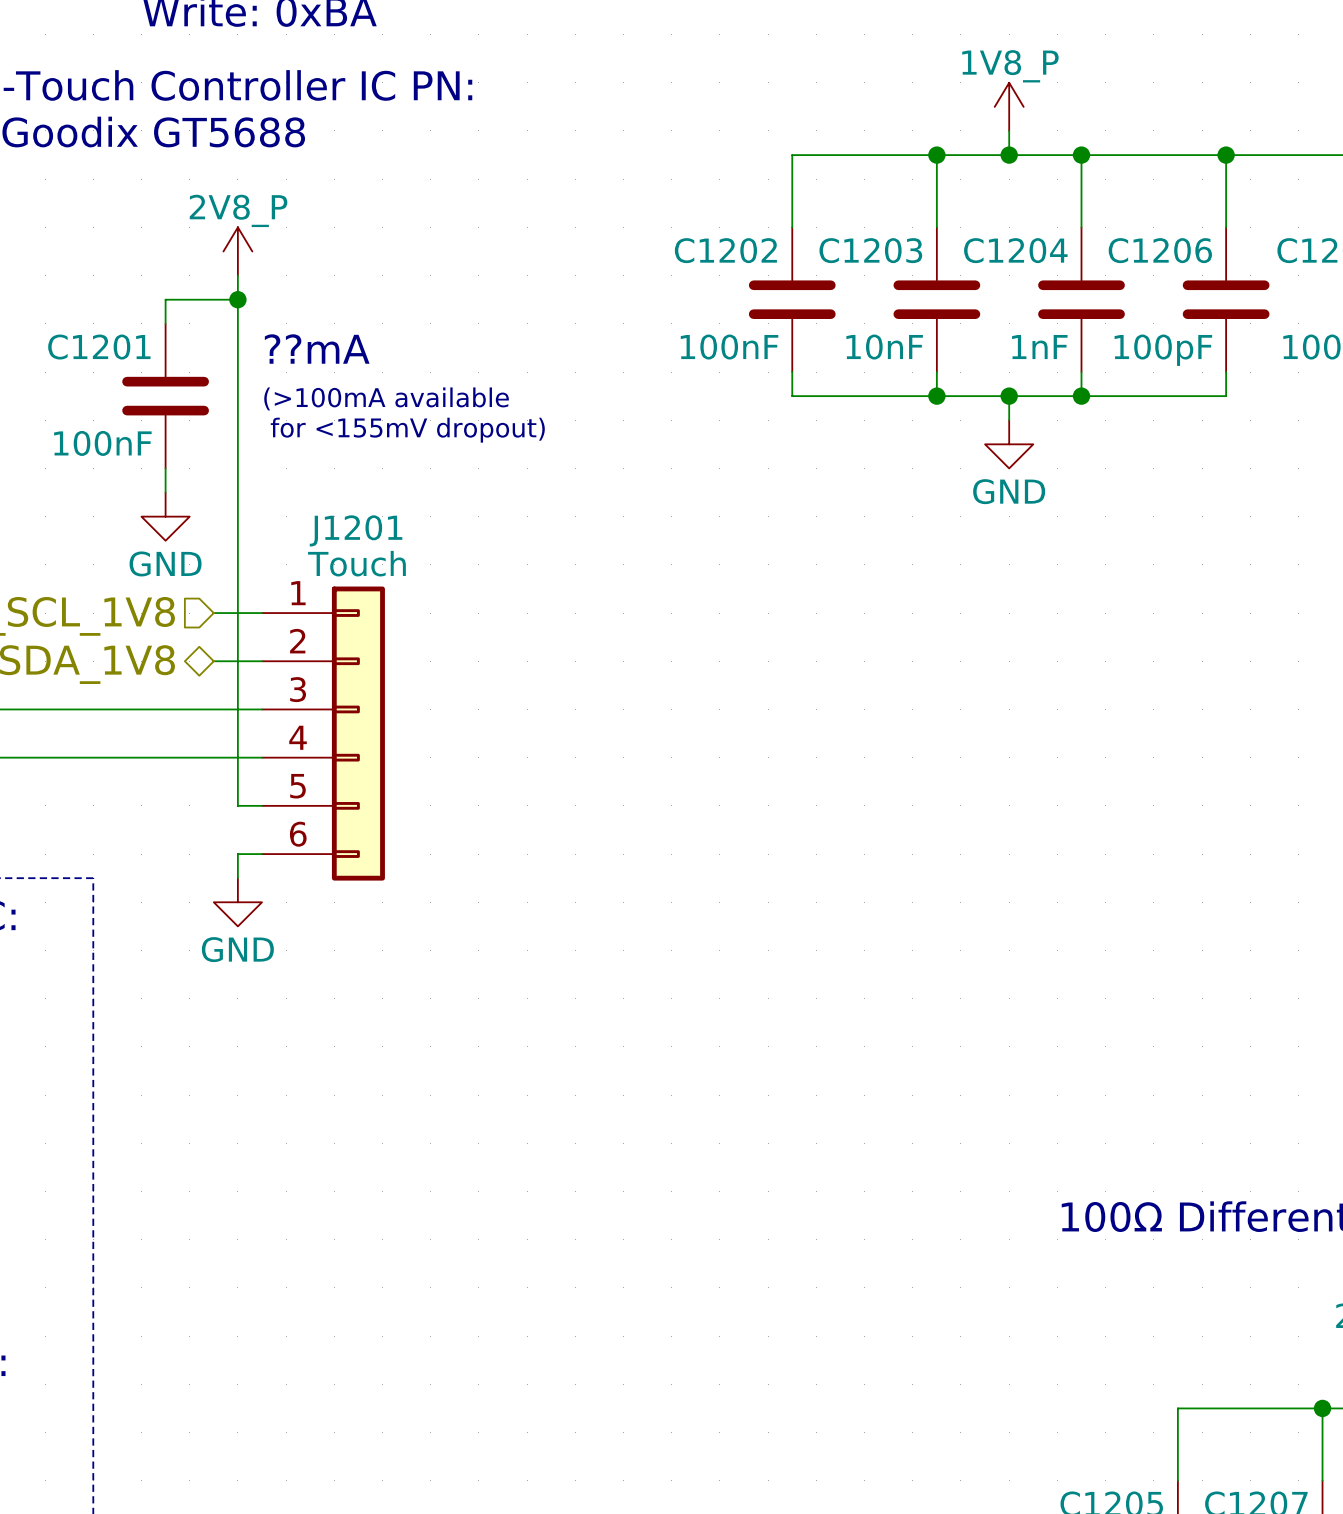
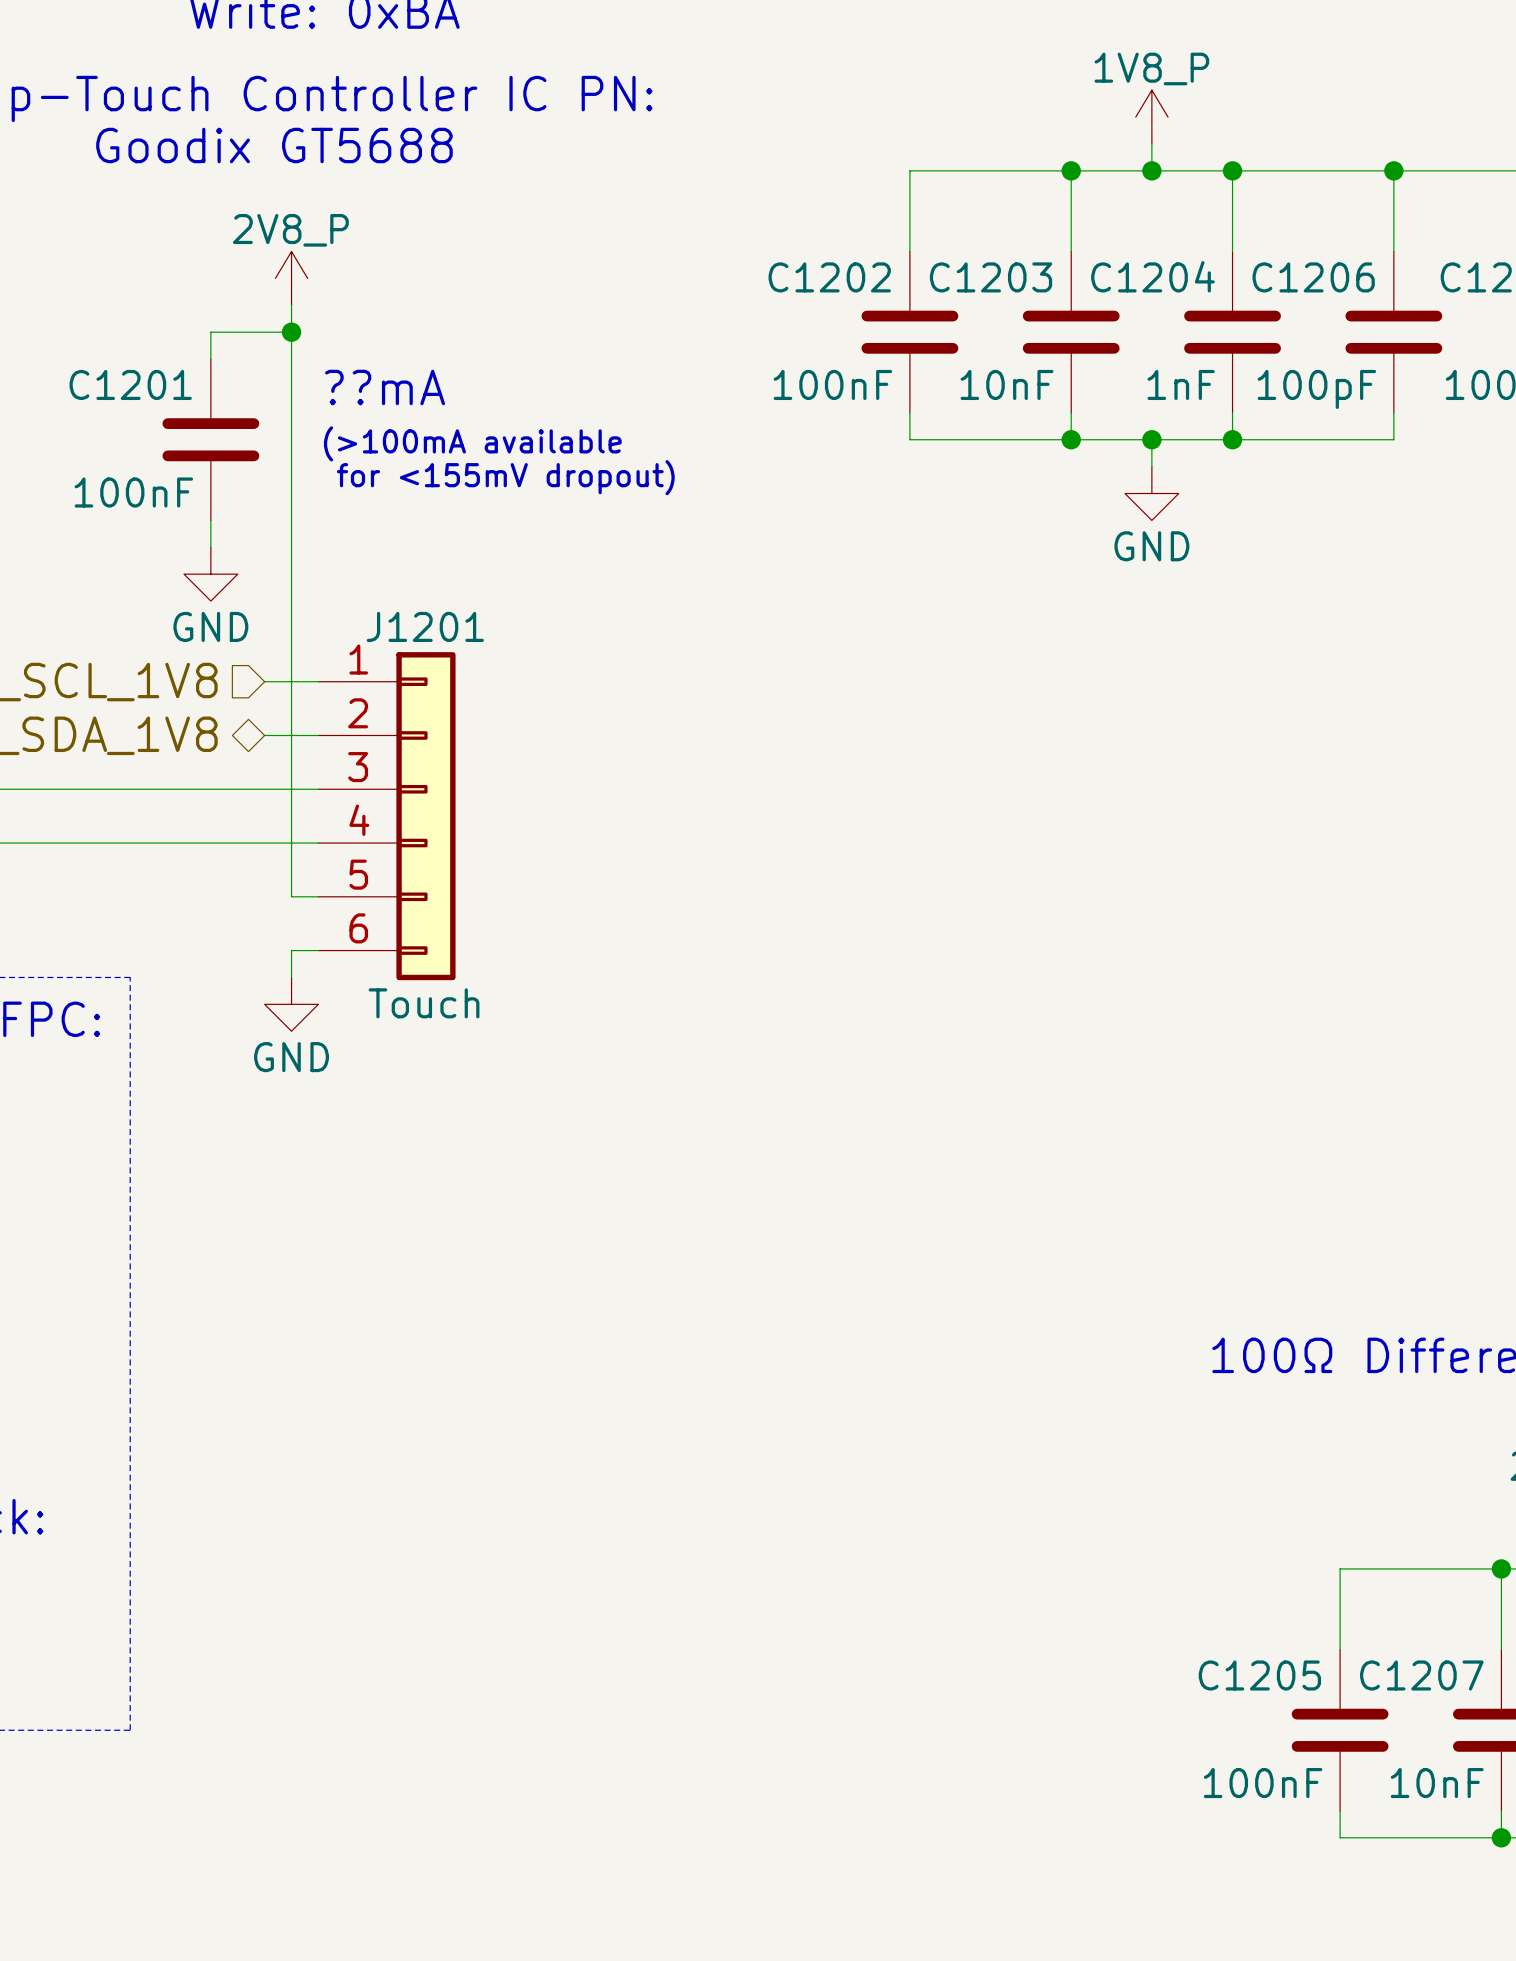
J1201 name position: J1201 (356, 530) -> J1201 (425, 626)
J1201 value position: Touch (356, 563) -> Touch (424, 1003)

